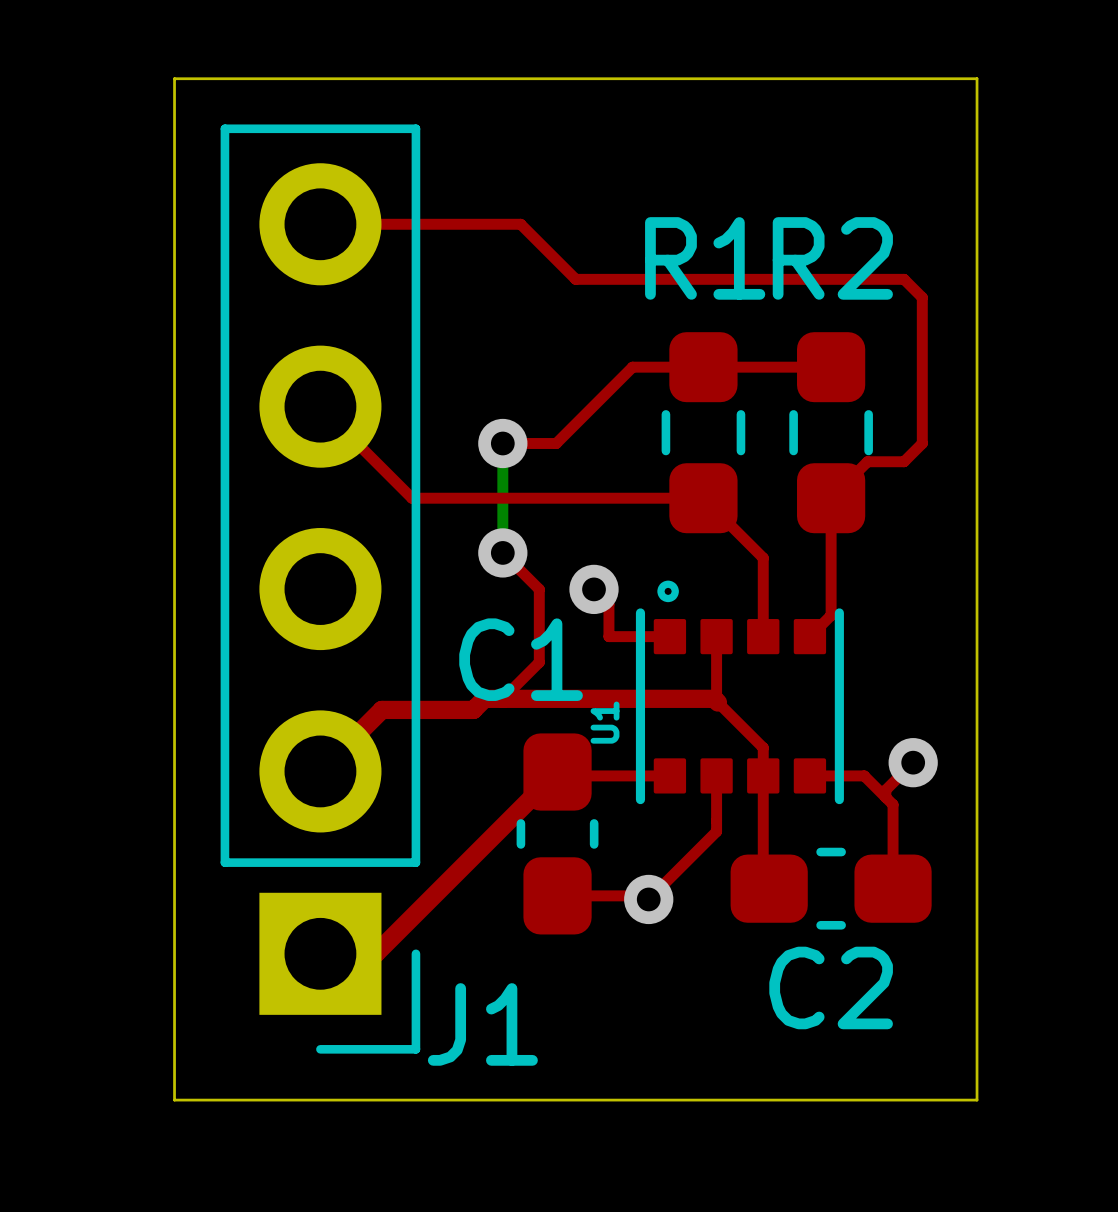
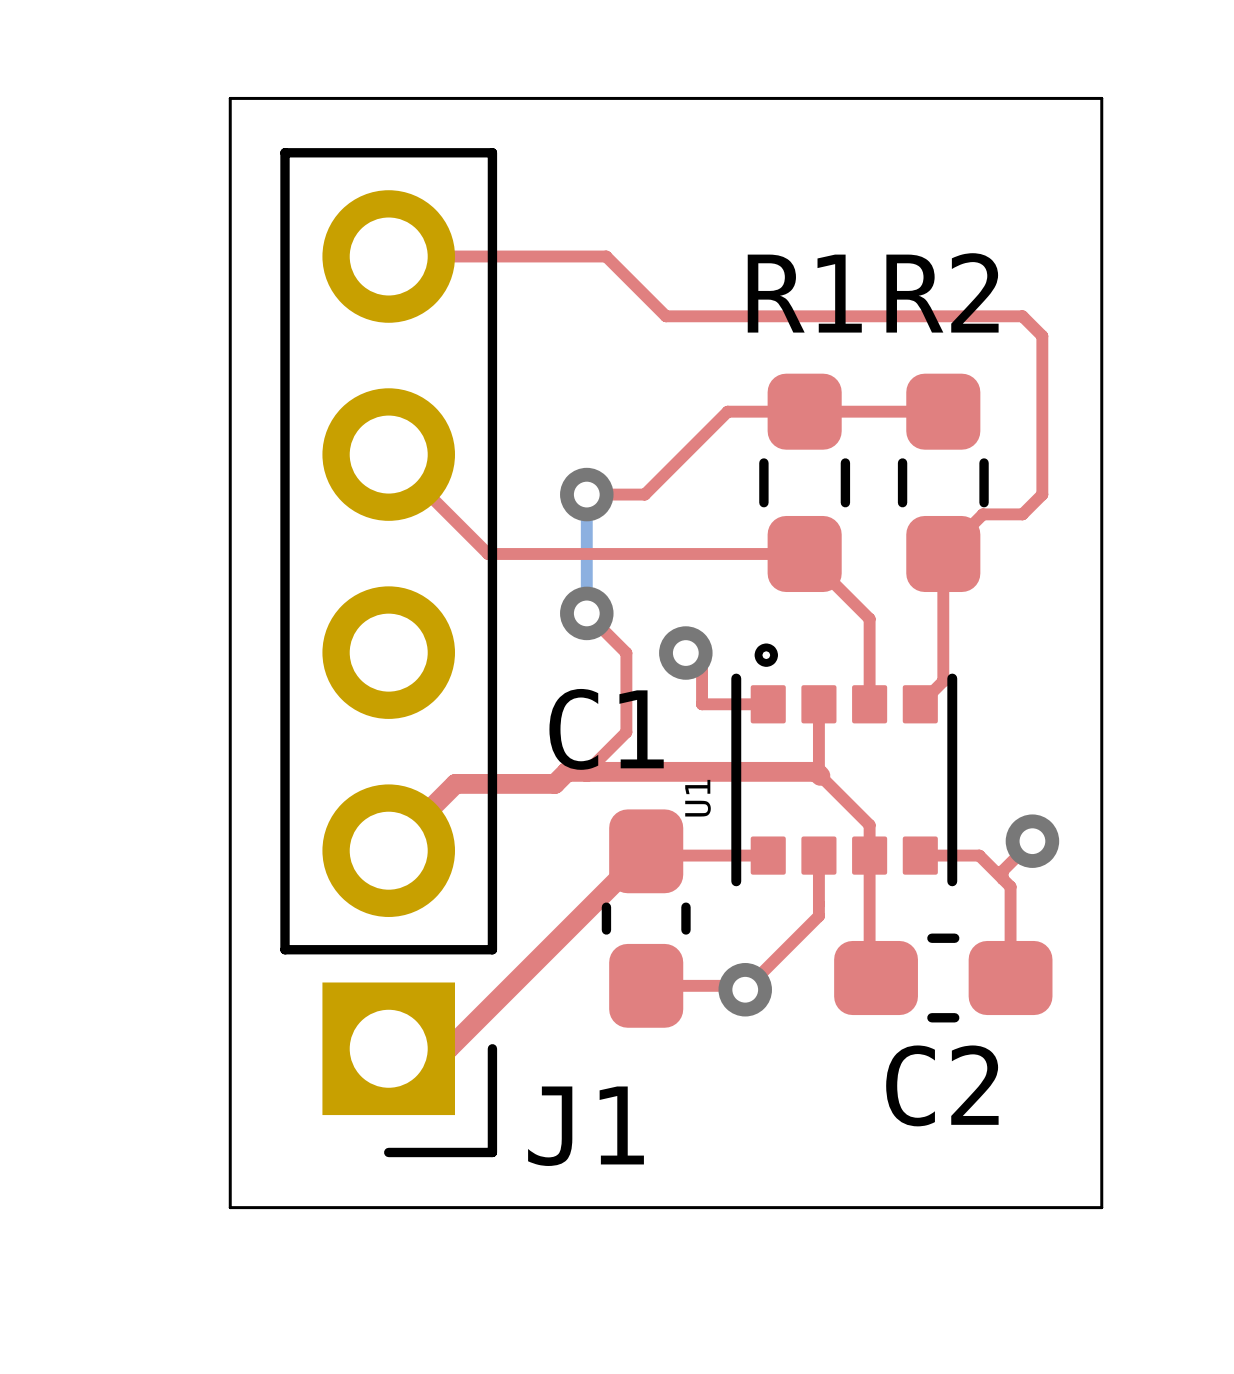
J1 name position: J1 (482, 1024) -> J1 (586, 1126)

